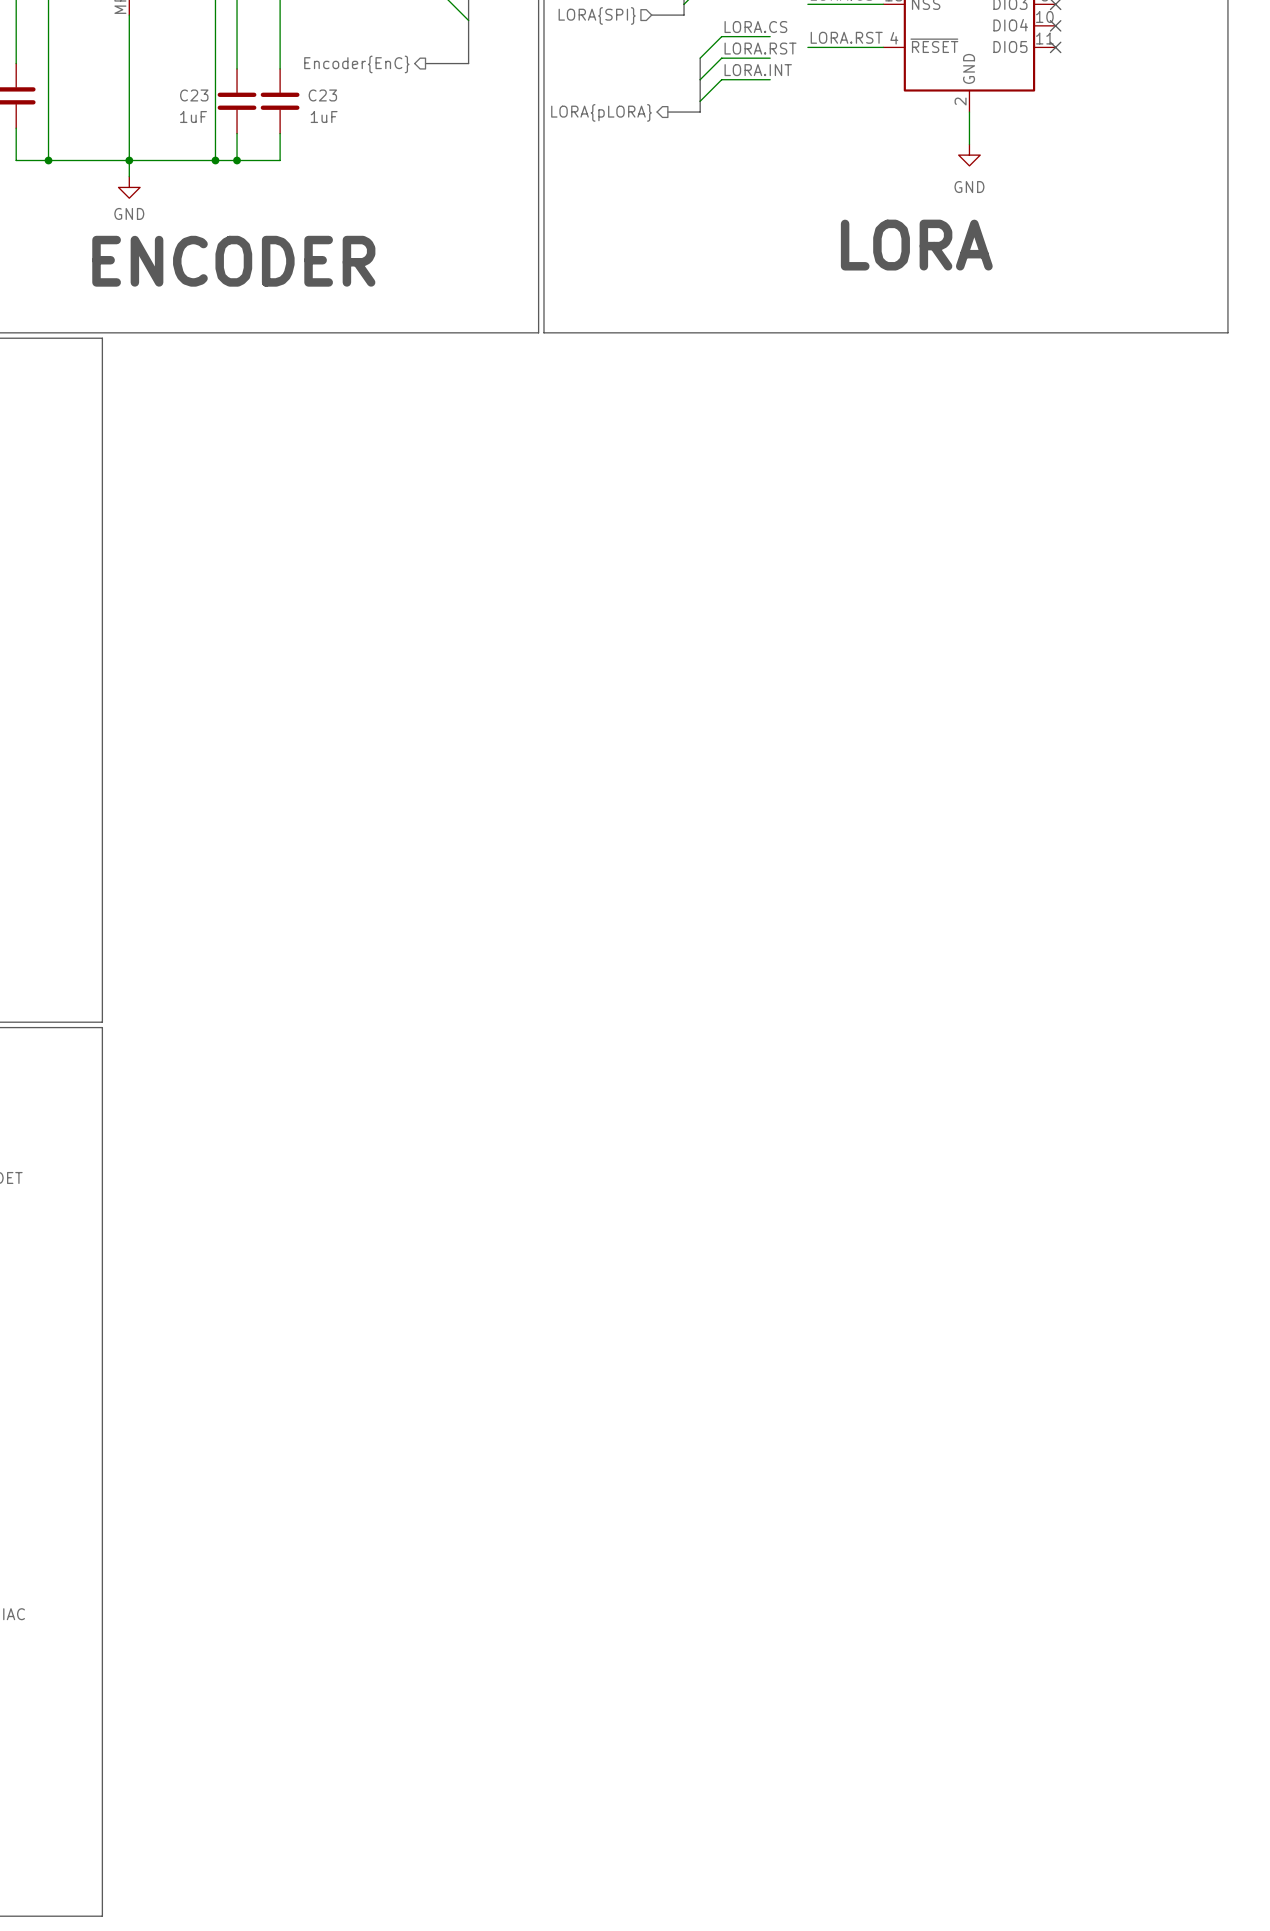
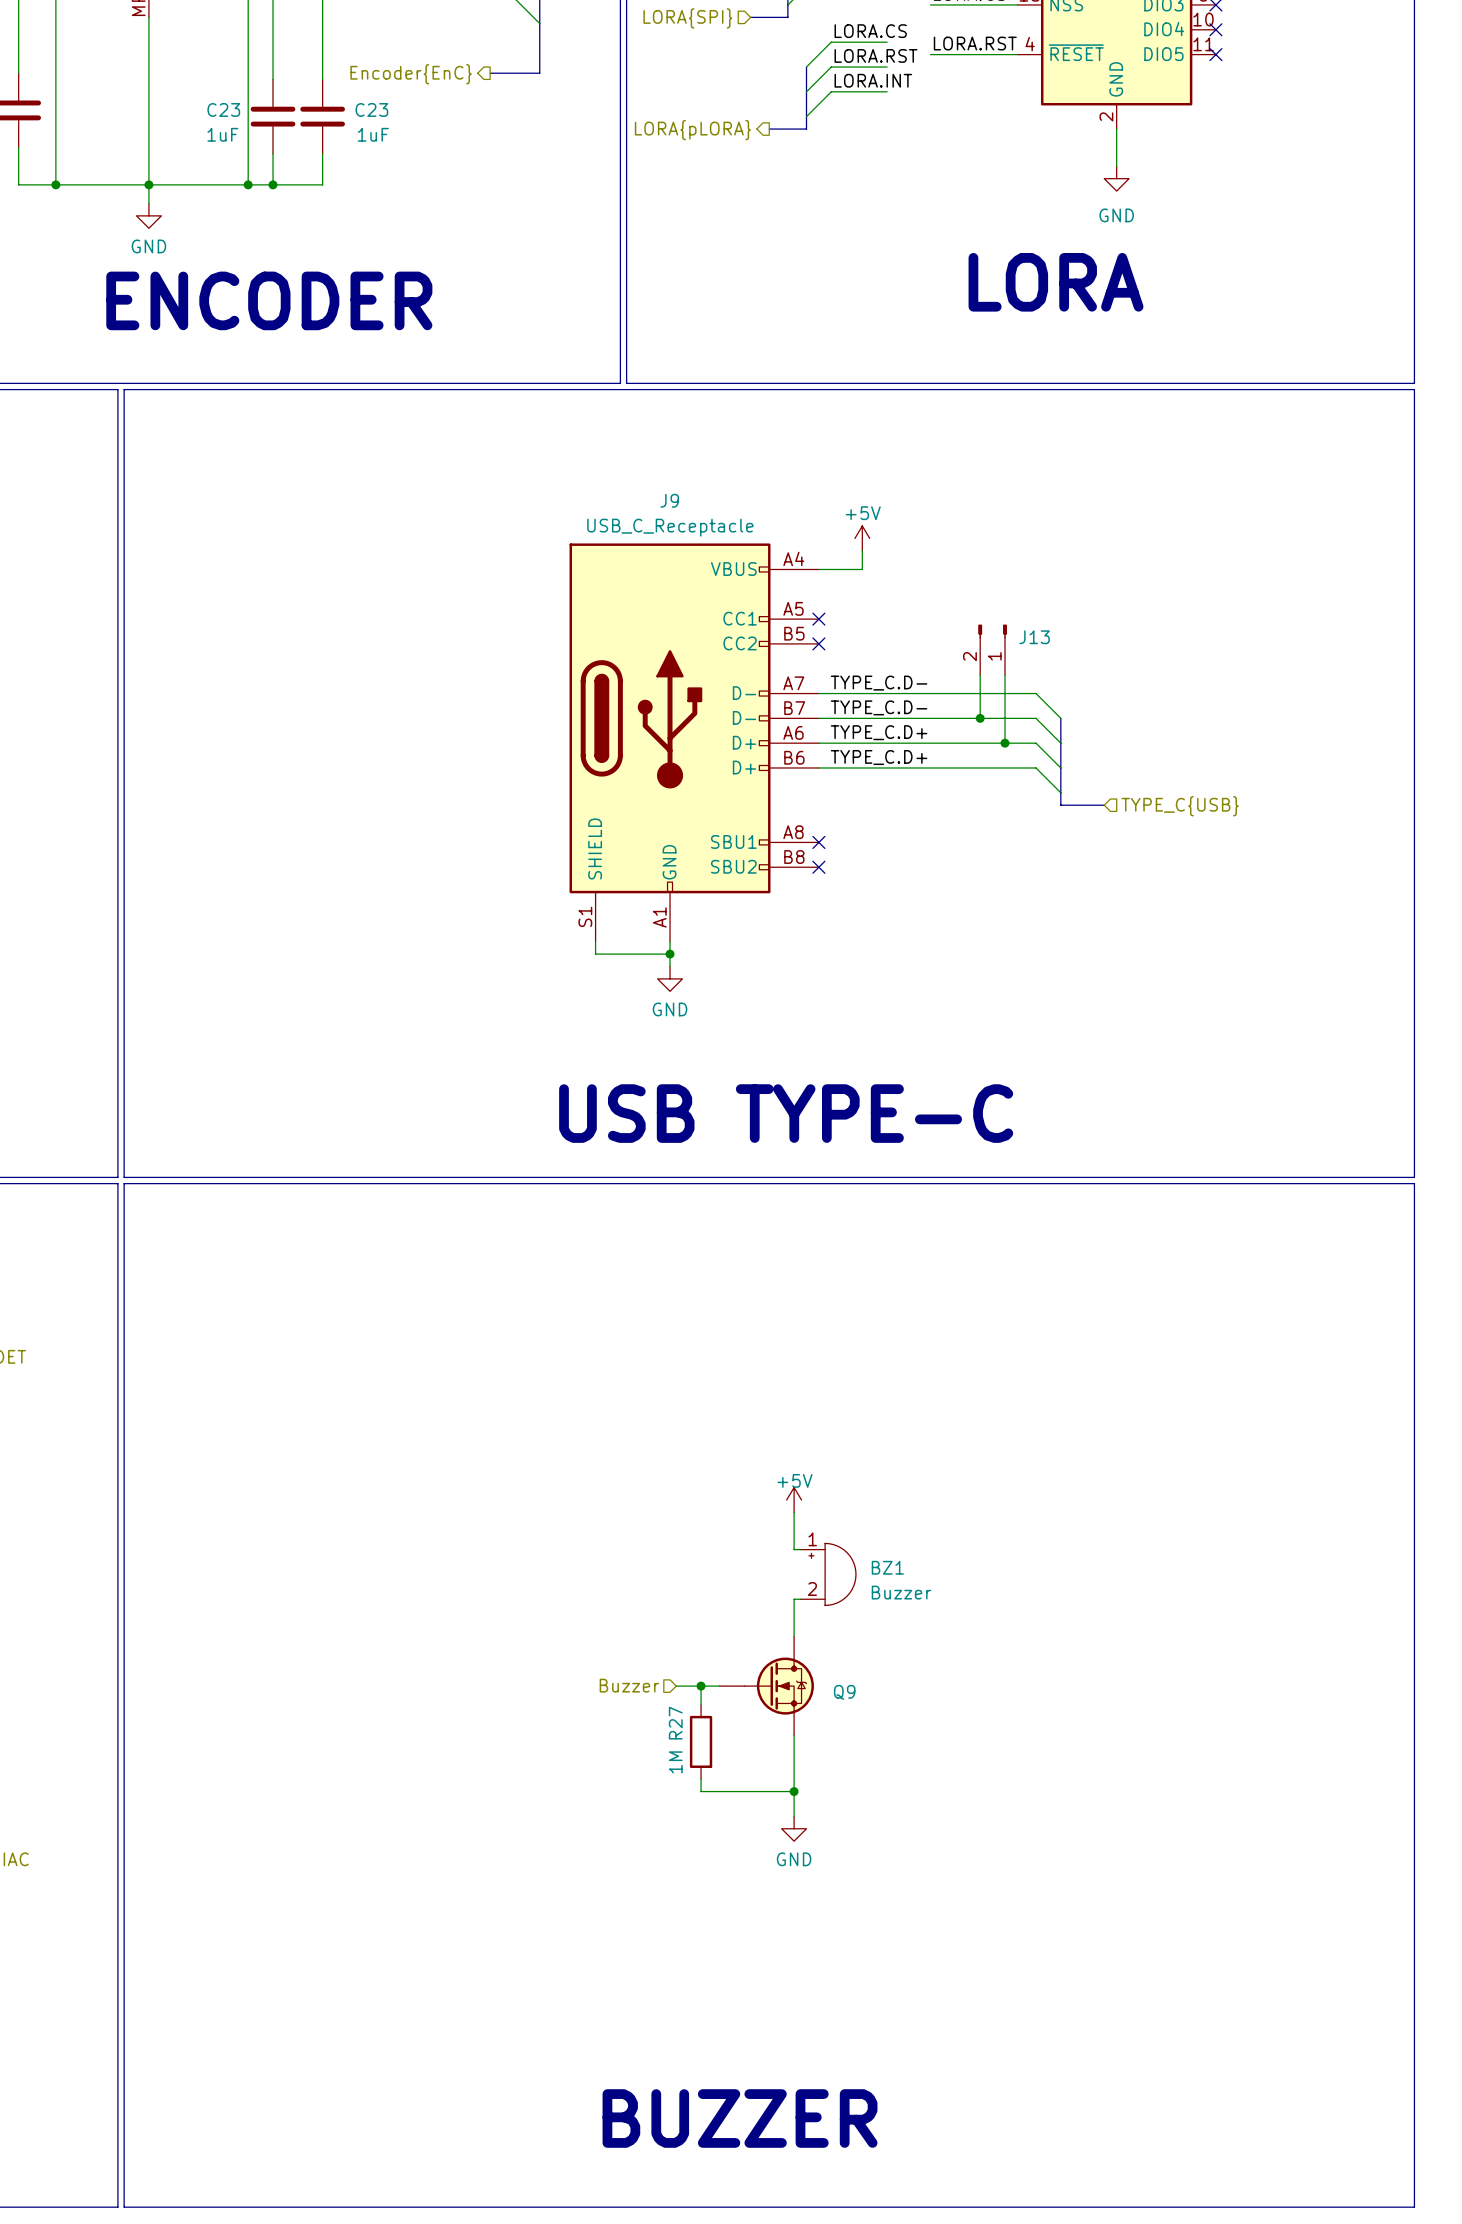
line: none -> (124, 389) (124, 1177) (1414, 1177) (1414, 389) (124, 389)
power symbol: none -> +5V (862, 538)
wire: none -> (862, 550) (862, 569) (818, 569)
no-connect mark: none -> (818, 619)
no-connect mark: none -> (818, 643)
J13: none -> (992, 649)
wire: none -> (980, 674) (980, 718)
wire: none -> (1005, 674) (1005, 743)
label: none -> TYPE_C.D- (879, 683)
wire: none -> (818, 693) (1036, 693) (1060, 718)
label: none -> TYPE_C.D- (879, 707)
wire: none -> (818, 718) (1036, 718) (1060, 743)
junction: none -> (980, 718)
bus: none -> (1060, 718) (1060, 805) (1104, 805)
label: none -> TYPE_C.D+ (879, 732)
J9: none -> USB_C_Receptacle (694, 742)
wire: none -> (818, 743) (1036, 743) (1060, 767)
junction: none -> (1005, 743)
label: none -> TYPE_C.D+ (879, 757)
wire: none -> (818, 767) (1036, 767) (1060, 792)
hierarchical label: none -> TYPE_C{USB} (1180, 806)
no-connect mark: none -> (818, 842)
no-connect mark: none -> (818, 867)
wire: none -> (595, 941) (595, 954) (670, 954)
wire: none -> (670, 941) (670, 966)
junction: none -> (670, 954)
power symbol: none -> GND (670, 978)
text: none -> USB TYPE-C (786, 1113)
line: none -> (124, 1183) (124, 2207) (1414, 2207) (1414, 1183) (124, 1183)
power symbol: none -> +5V (794, 1499)
wire: none -> (794, 1512) (794, 1549) (800, 1549)
BZ1: none -> Buzzer (828, 1574)
wire: none -> (800, 1599) (794, 1599) (794, 1636)
hierarchical label: none -> Buzzer (629, 1685)
wire: none -> (676, 1686) (719, 1686)
wire: none -> (701, 1686) (701, 1704)
junction: none -> (701, 1686)
Q9: none -> (766, 1686)
wire: none -> (794, 1735) (794, 1816)
R27: none -> 1M (701, 1741)
wire: none -> (701, 1779) (701, 1791) (794, 1791)
junction: none -> (794, 1791)
power symbol: none -> GND (794, 1828)
text: none -> BUZZER (740, 2118)

